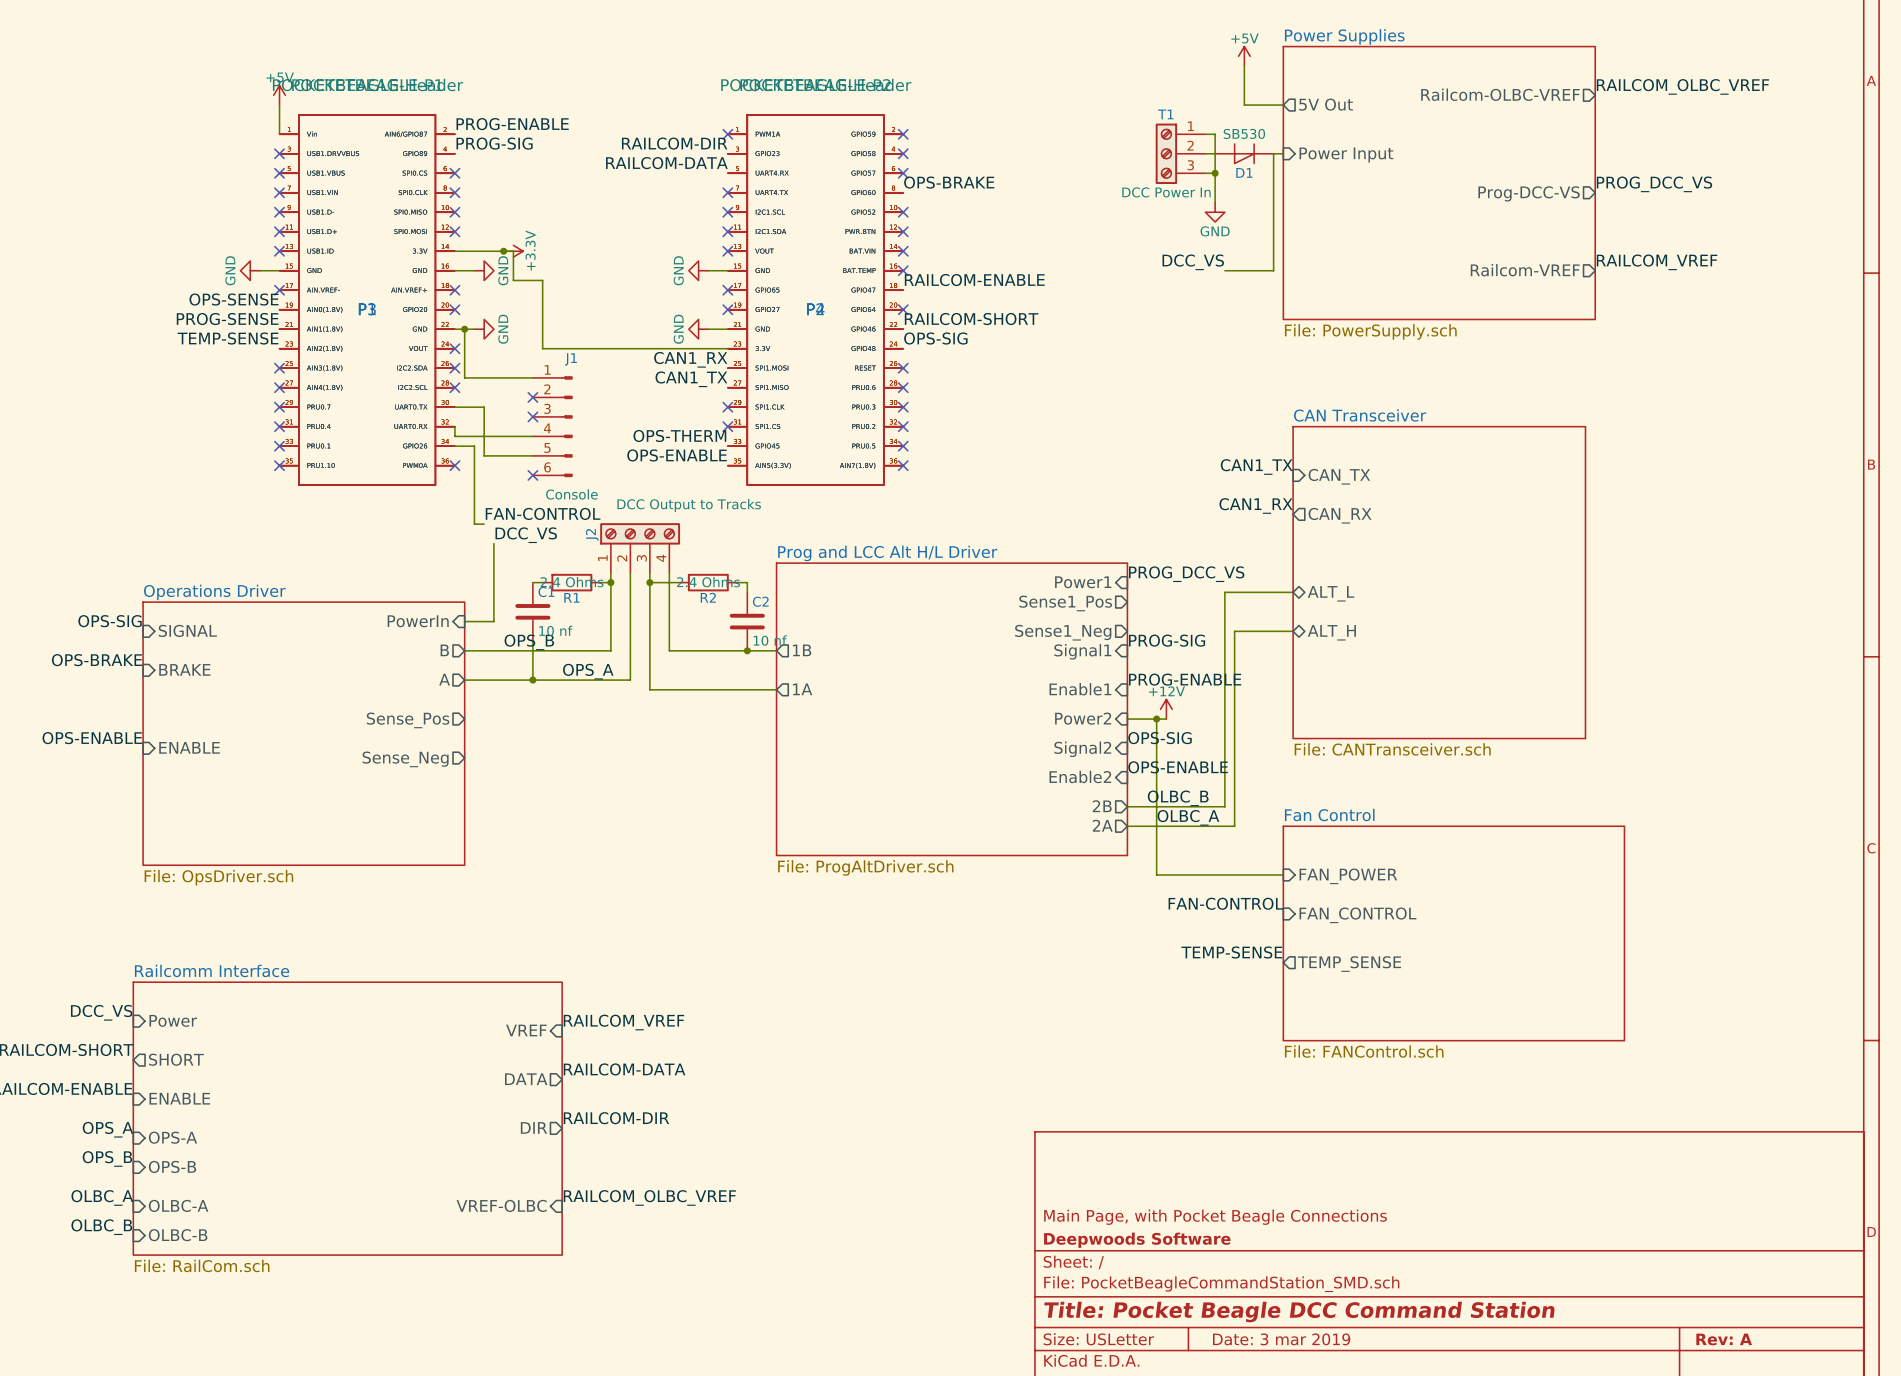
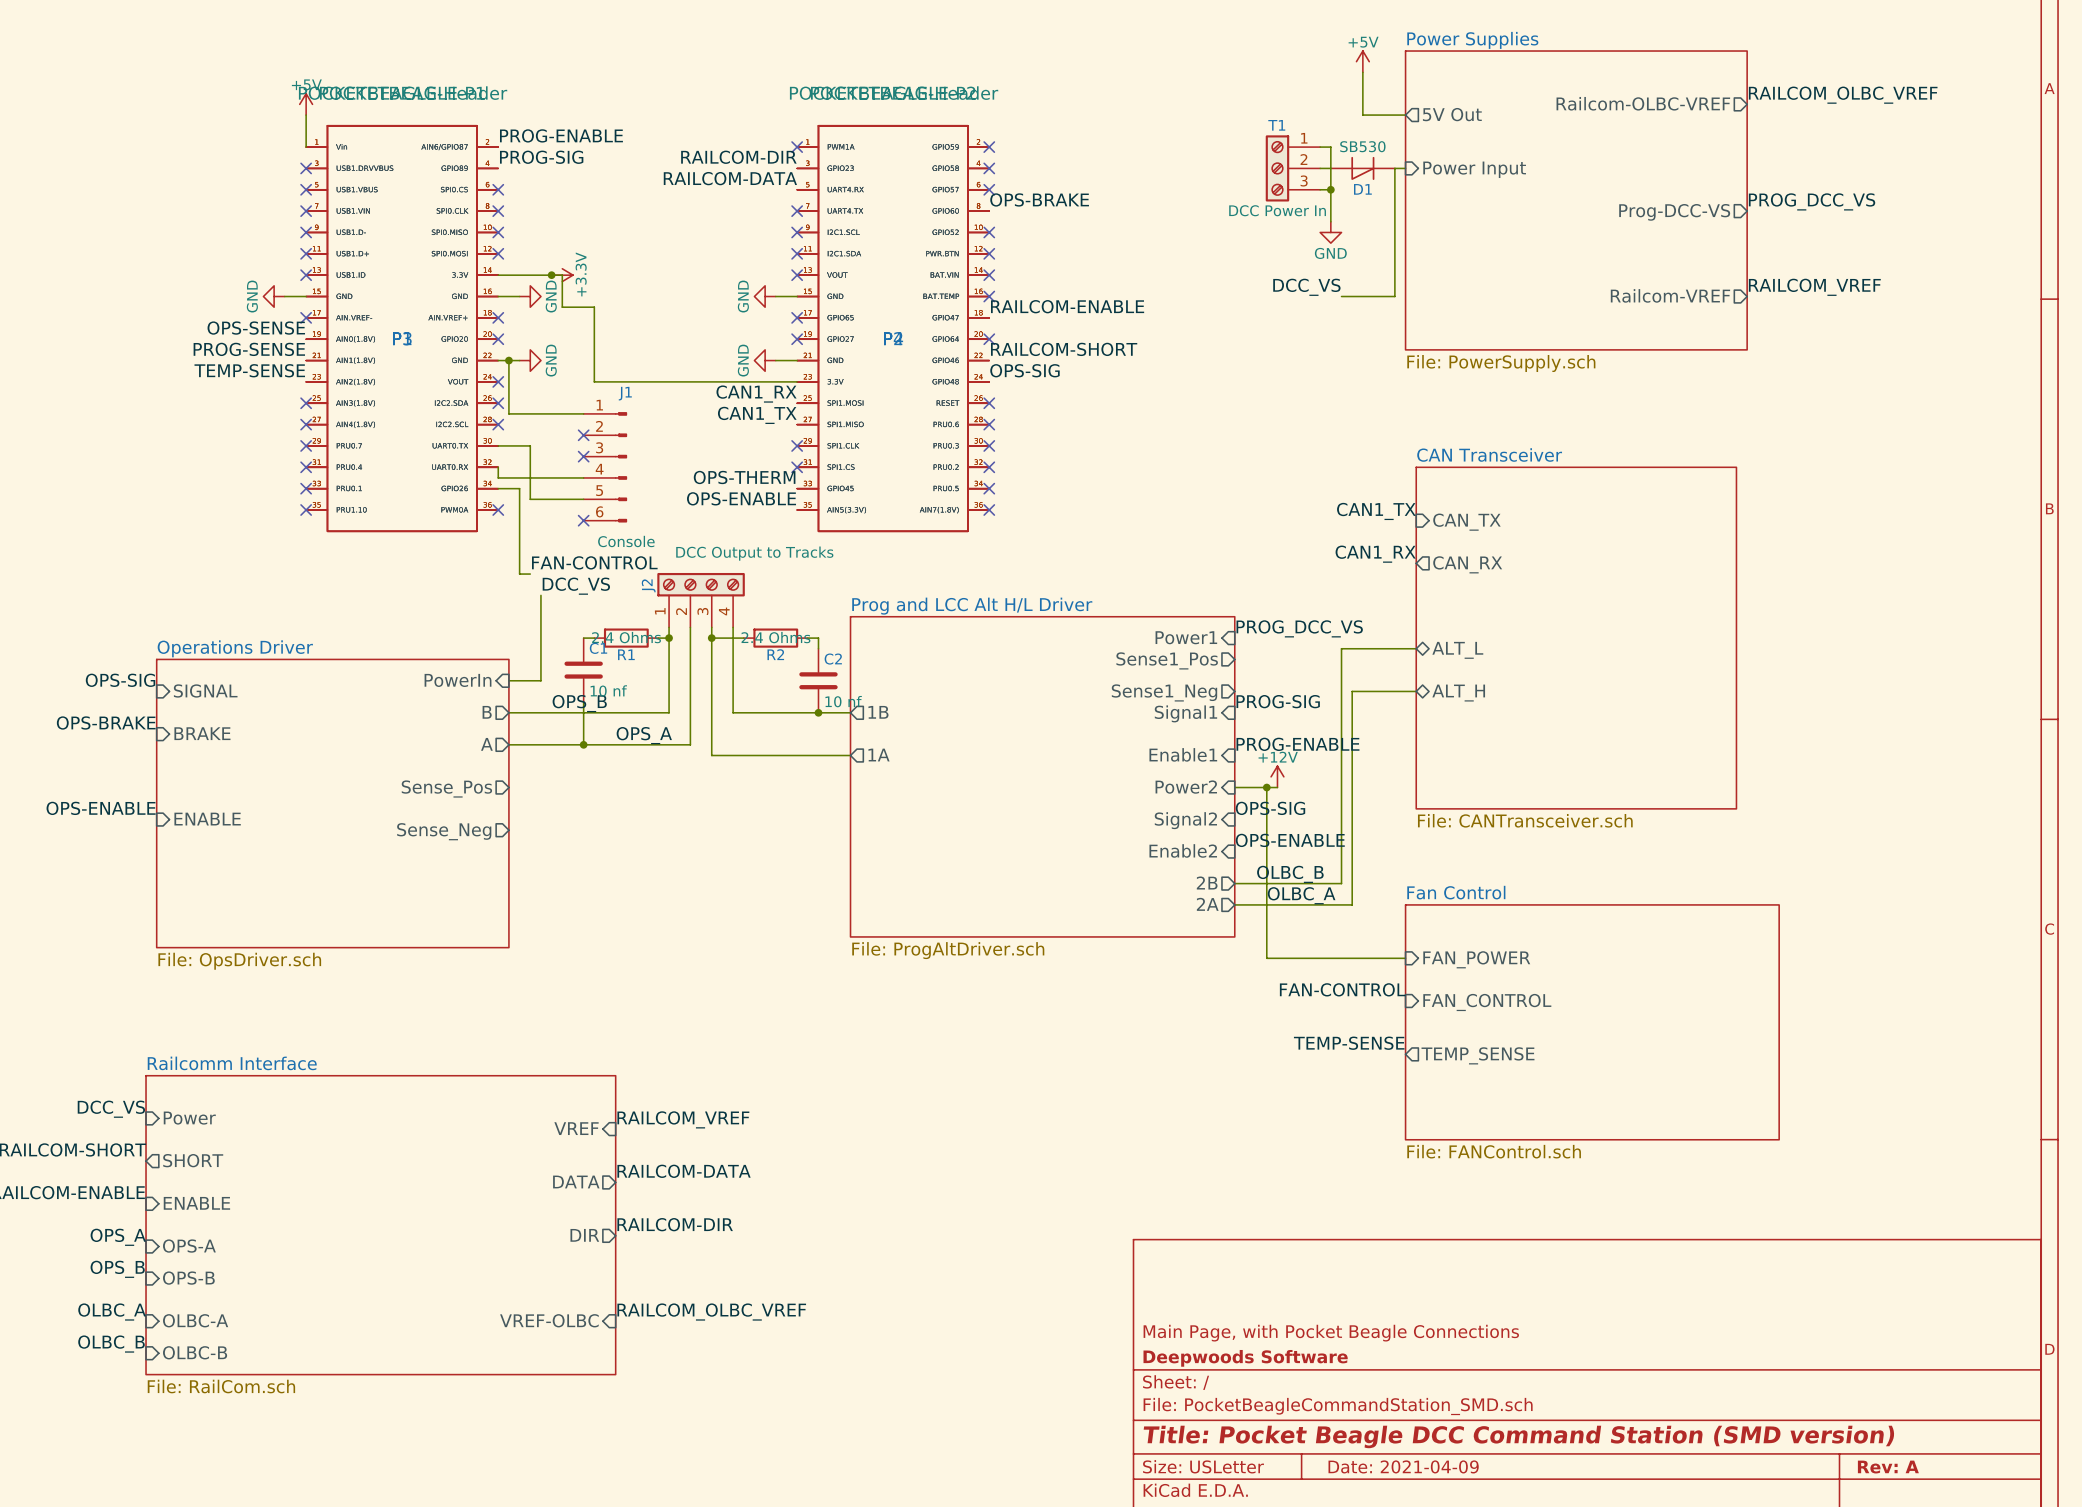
title block: Title: Pocket Beagle DCC Command Station (1299, 1312) -> Title: Pocket Beagle DCC Command Station (SMD version) (1518, 1436)
title block: Date: 3 mar 2019 (1281, 1339) -> Date: 2021-04-09 (1403, 1466)

